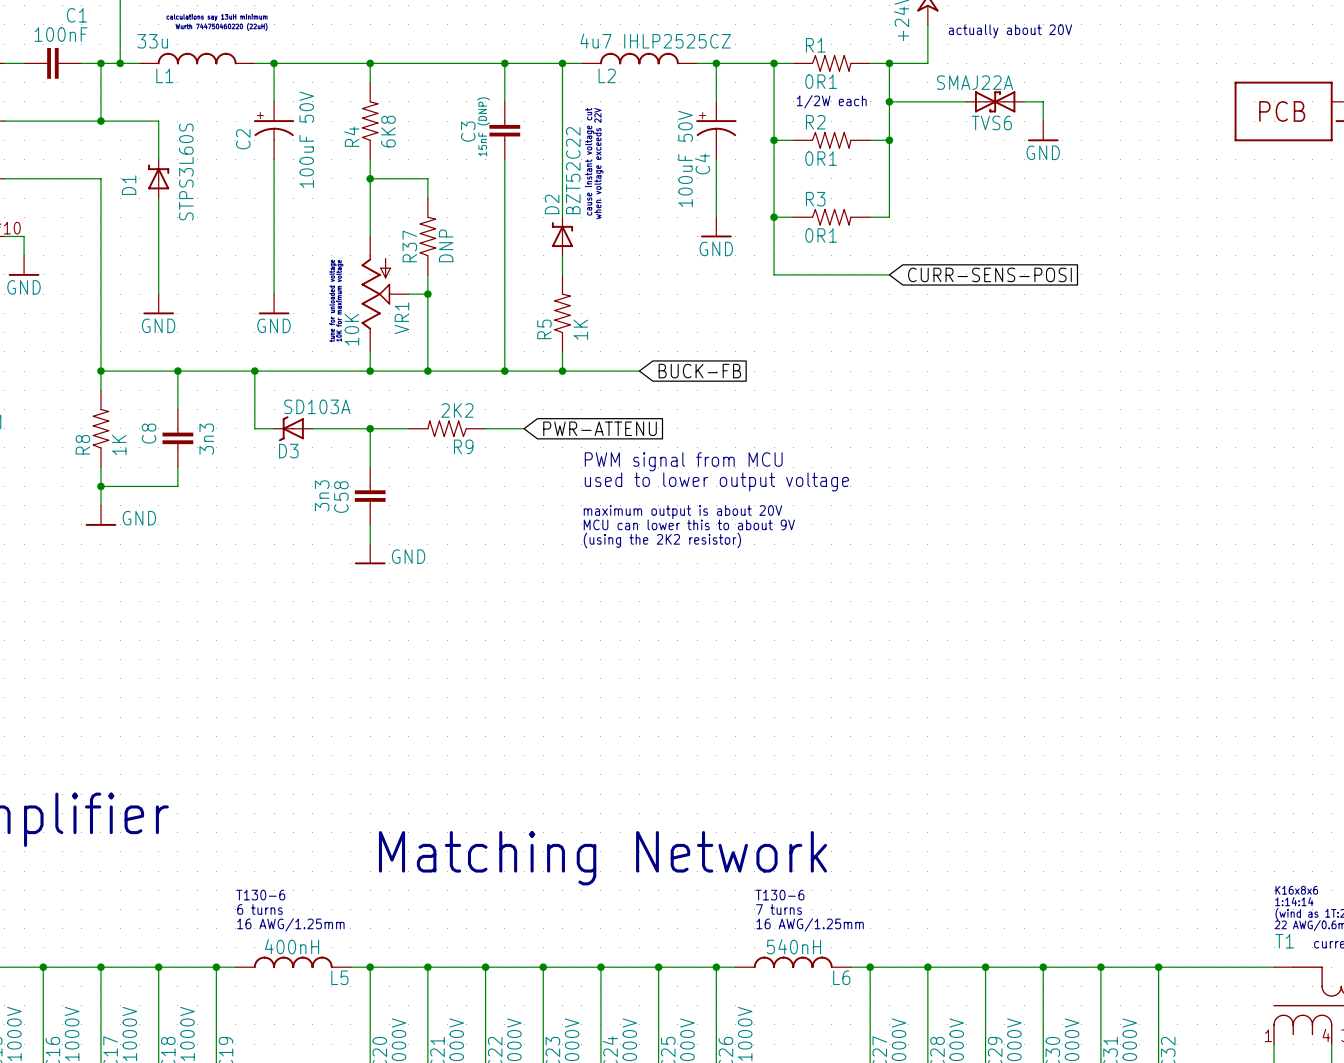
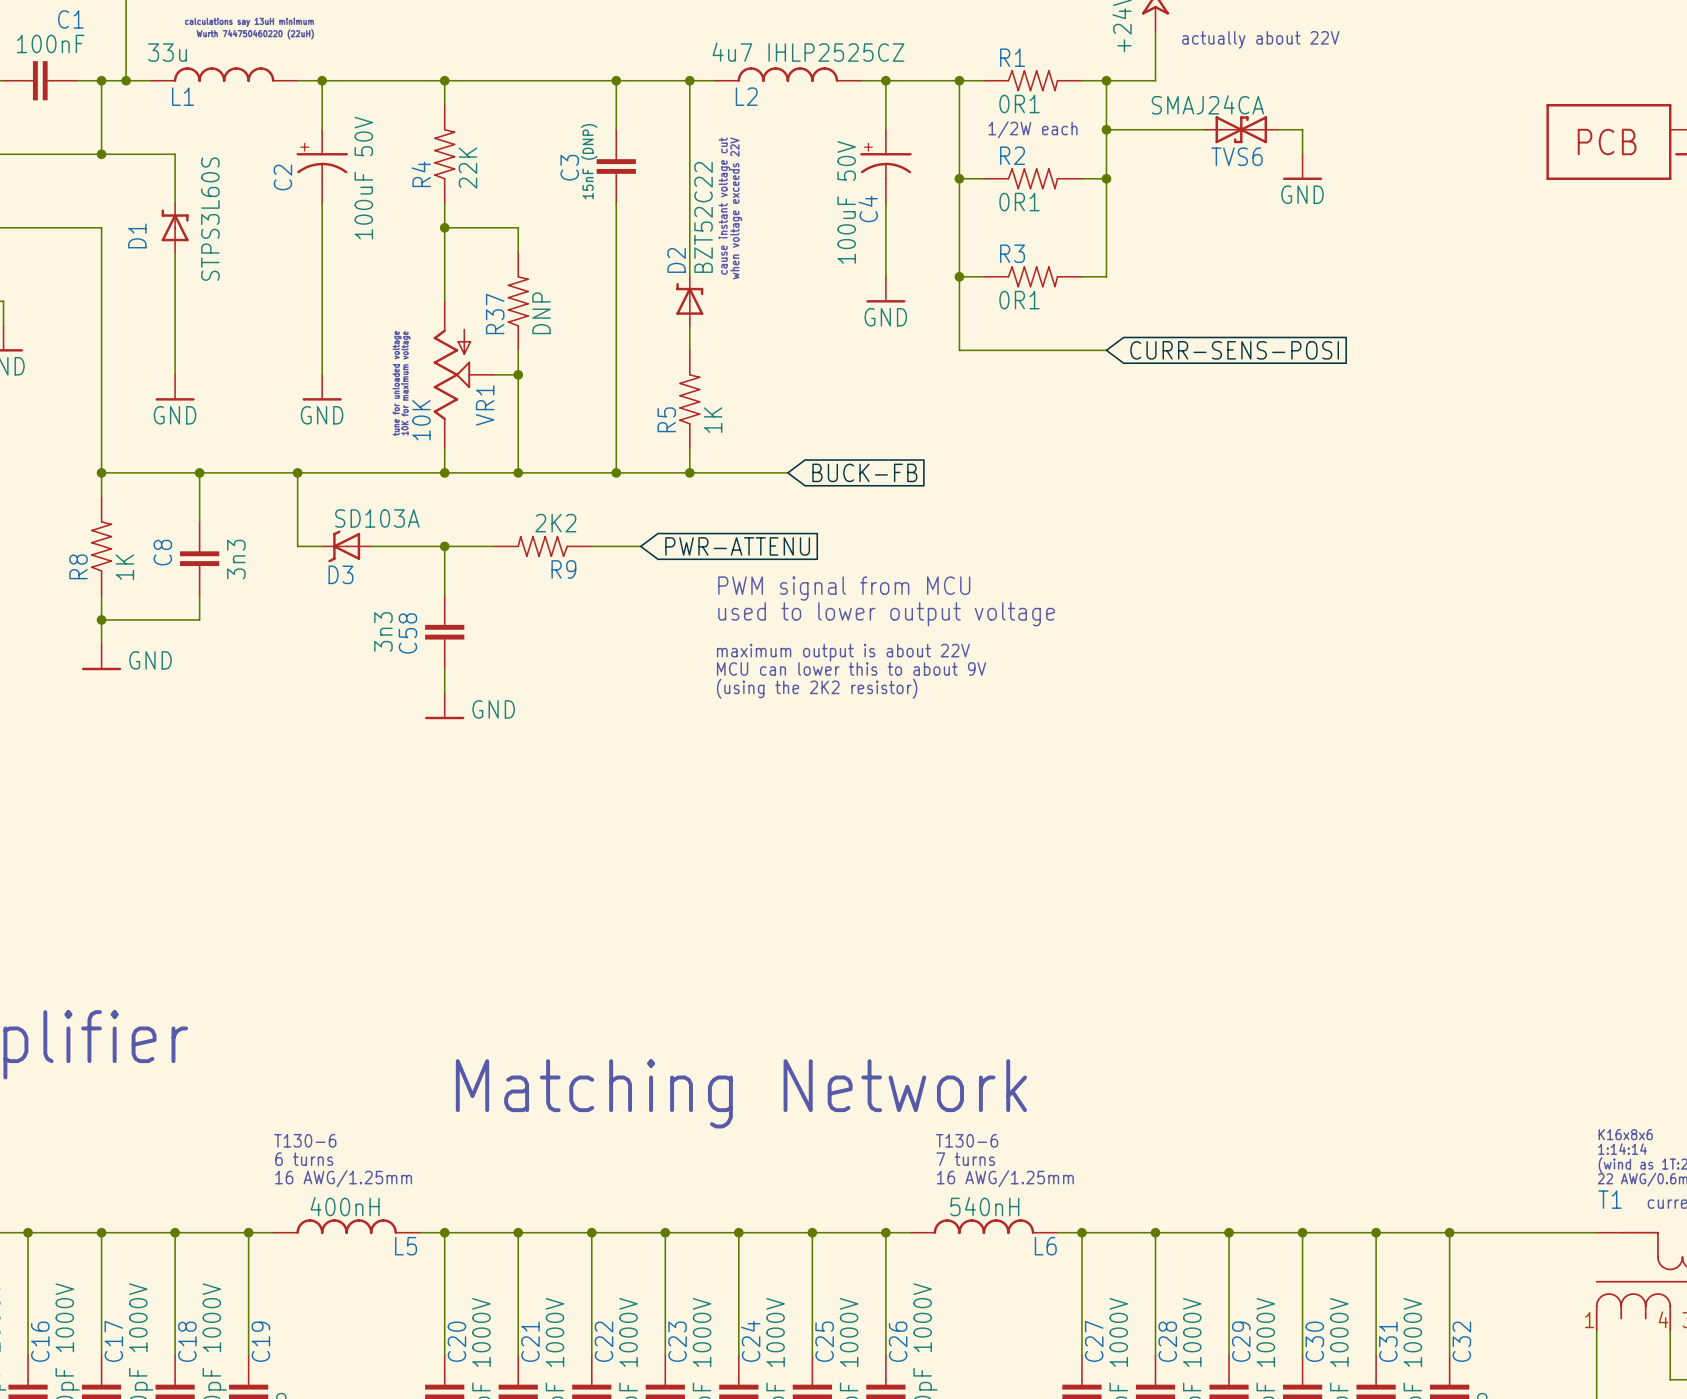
text: actually about 20V (1010, 31) -> actually about 22V (1260, 39)
TVS6 value: SMAJ22A (975, 82) -> SMAJ24CA (1207, 104)
R4 value: 6K8 (388, 131) -> 22K (467, 168)
text: maximum output is about 20V (682, 512) -> maximum output is about 22V (843, 652)

